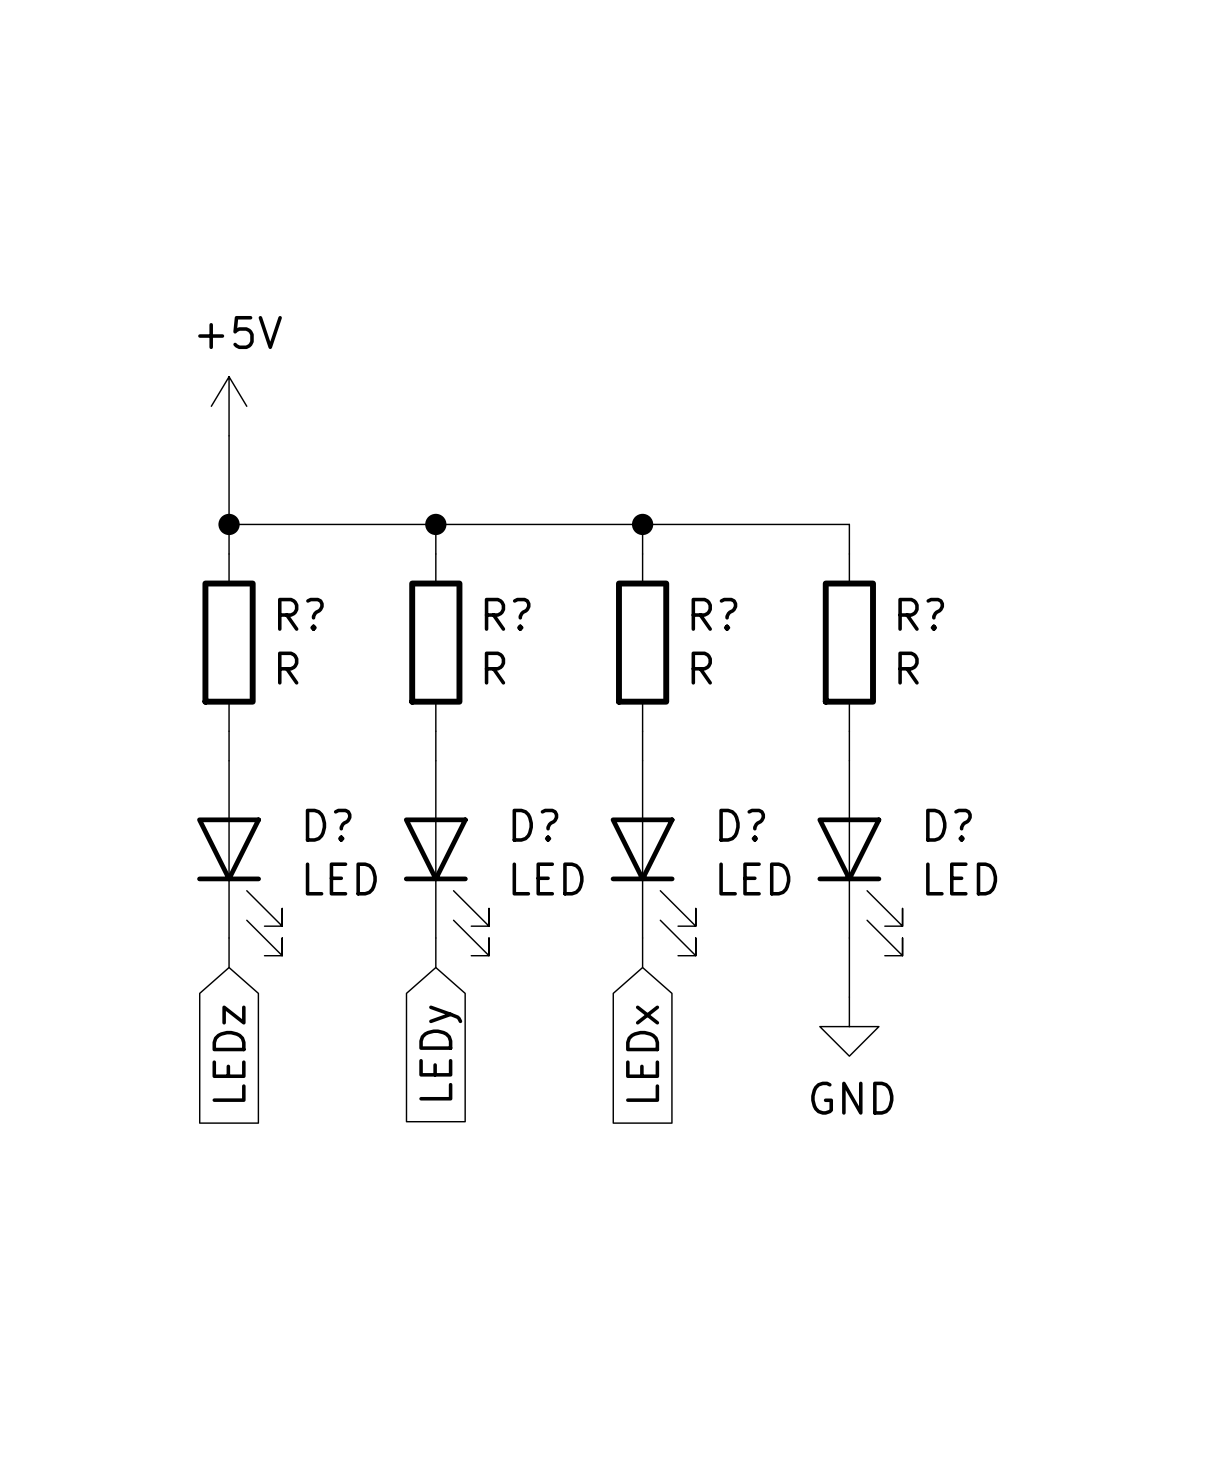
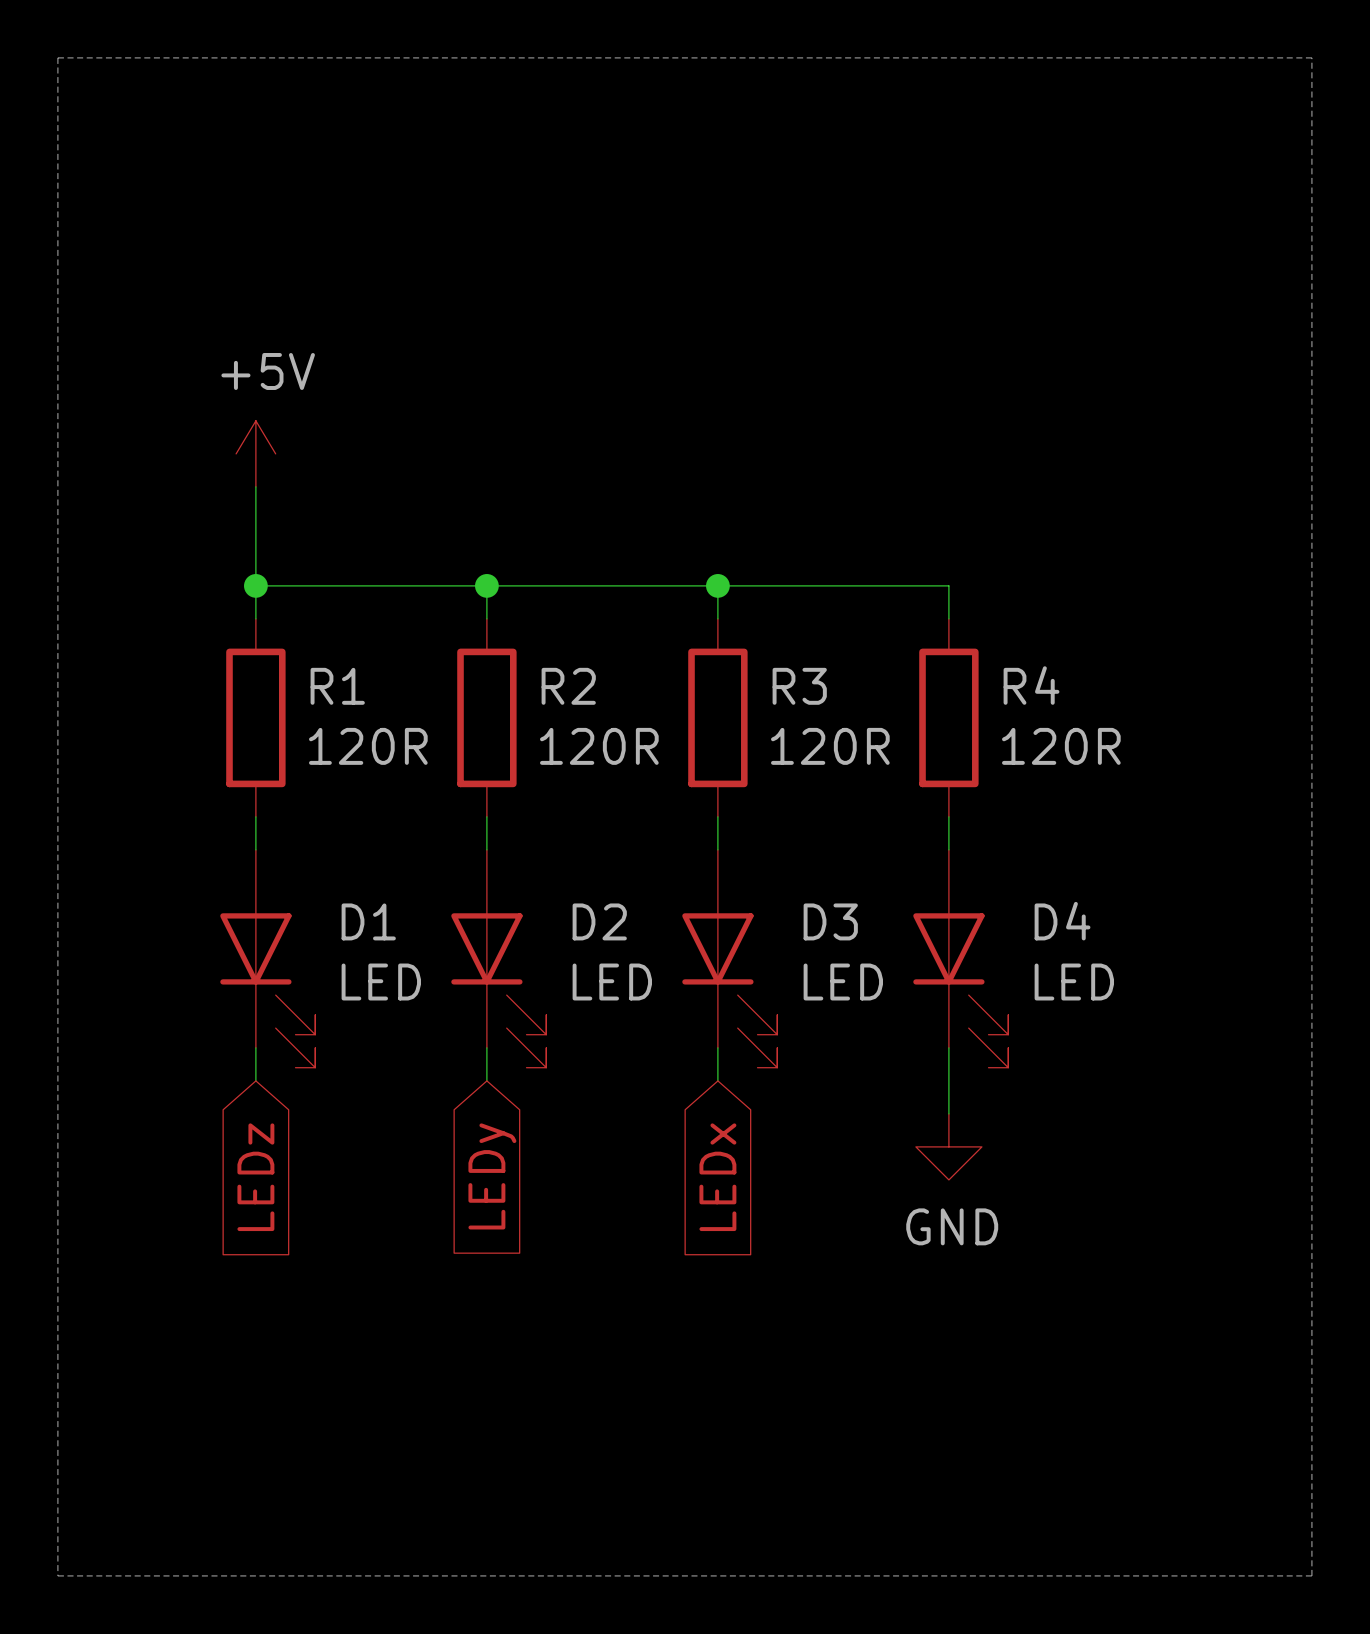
line: none -> (57, 57) (57, 1575) (1311, 1575) (1311, 57) (57, 57)
R? name: R? (300, 614) -> R1 (337, 686)
R? name: R? (507, 614) -> R2 (568, 686)
R? name: R? (714, 614) -> R3 (799, 686)
R? name: R? (921, 614) -> R4 (1031, 685)
R? value: R (288, 668) -> 120R (368, 746)
R? value: R (494, 668) -> 120R (599, 746)
R? value: R (701, 668) -> 120R (830, 746)
R? value: R (908, 668) -> 120R (1061, 746)
D? name: D? (328, 825) -> D1 (368, 921)
D? name: D? (535, 825) -> D2 (599, 921)
D? name: D? (742, 825) -> D3 (830, 921)
D? name: D? (948, 825) -> D4 (1062, 921)

